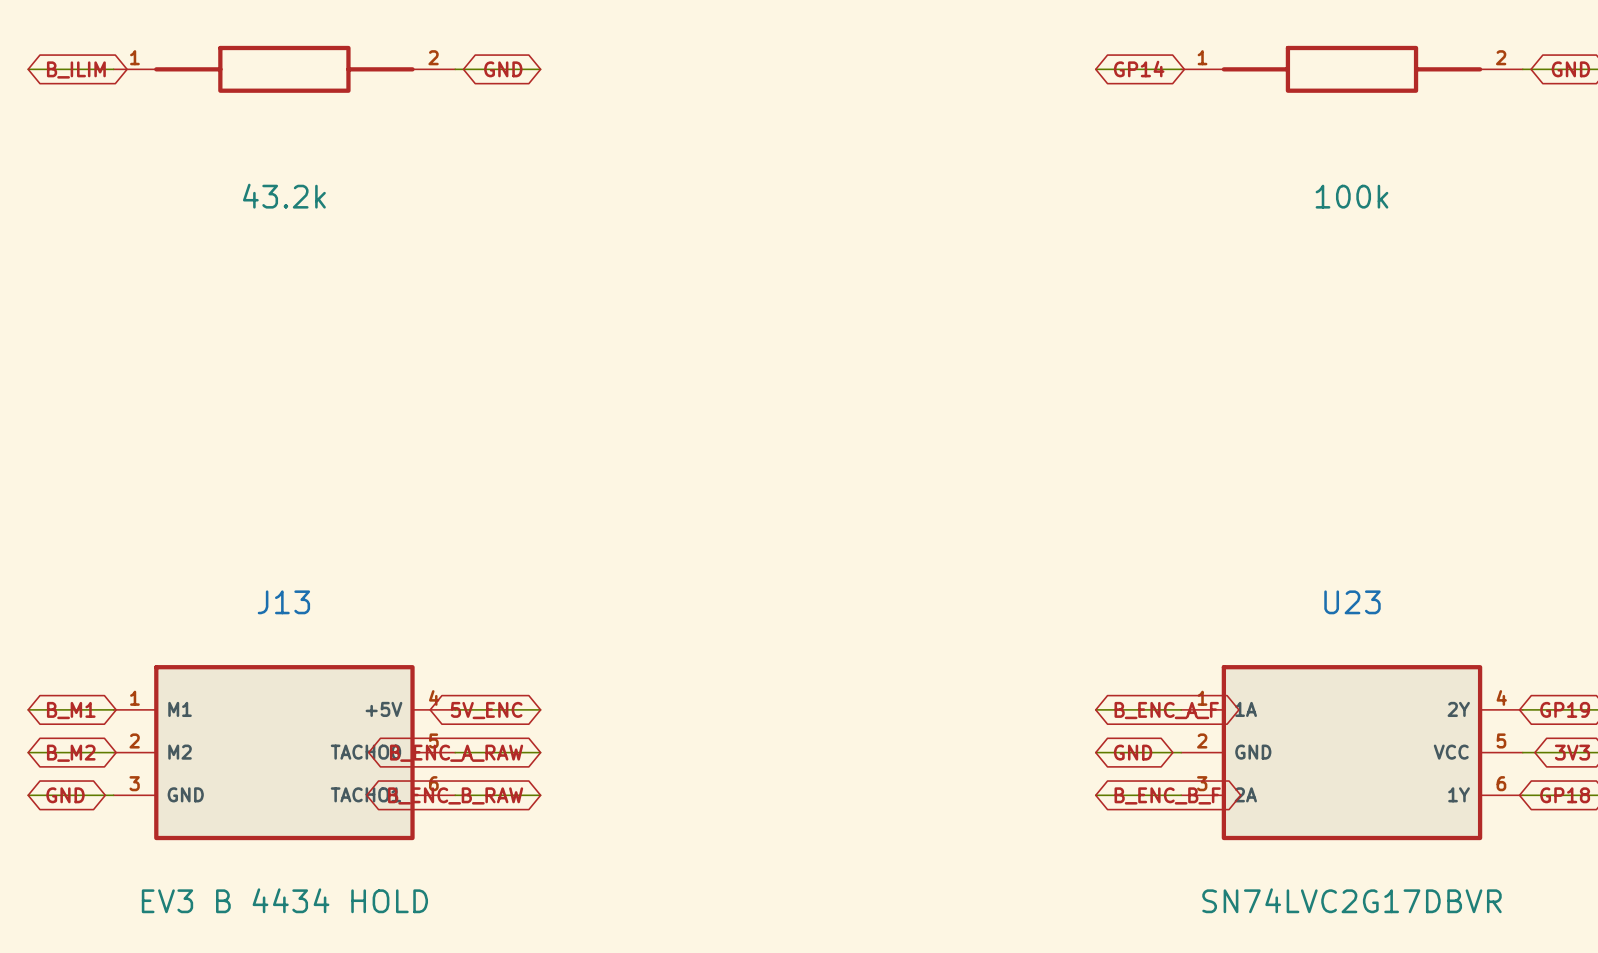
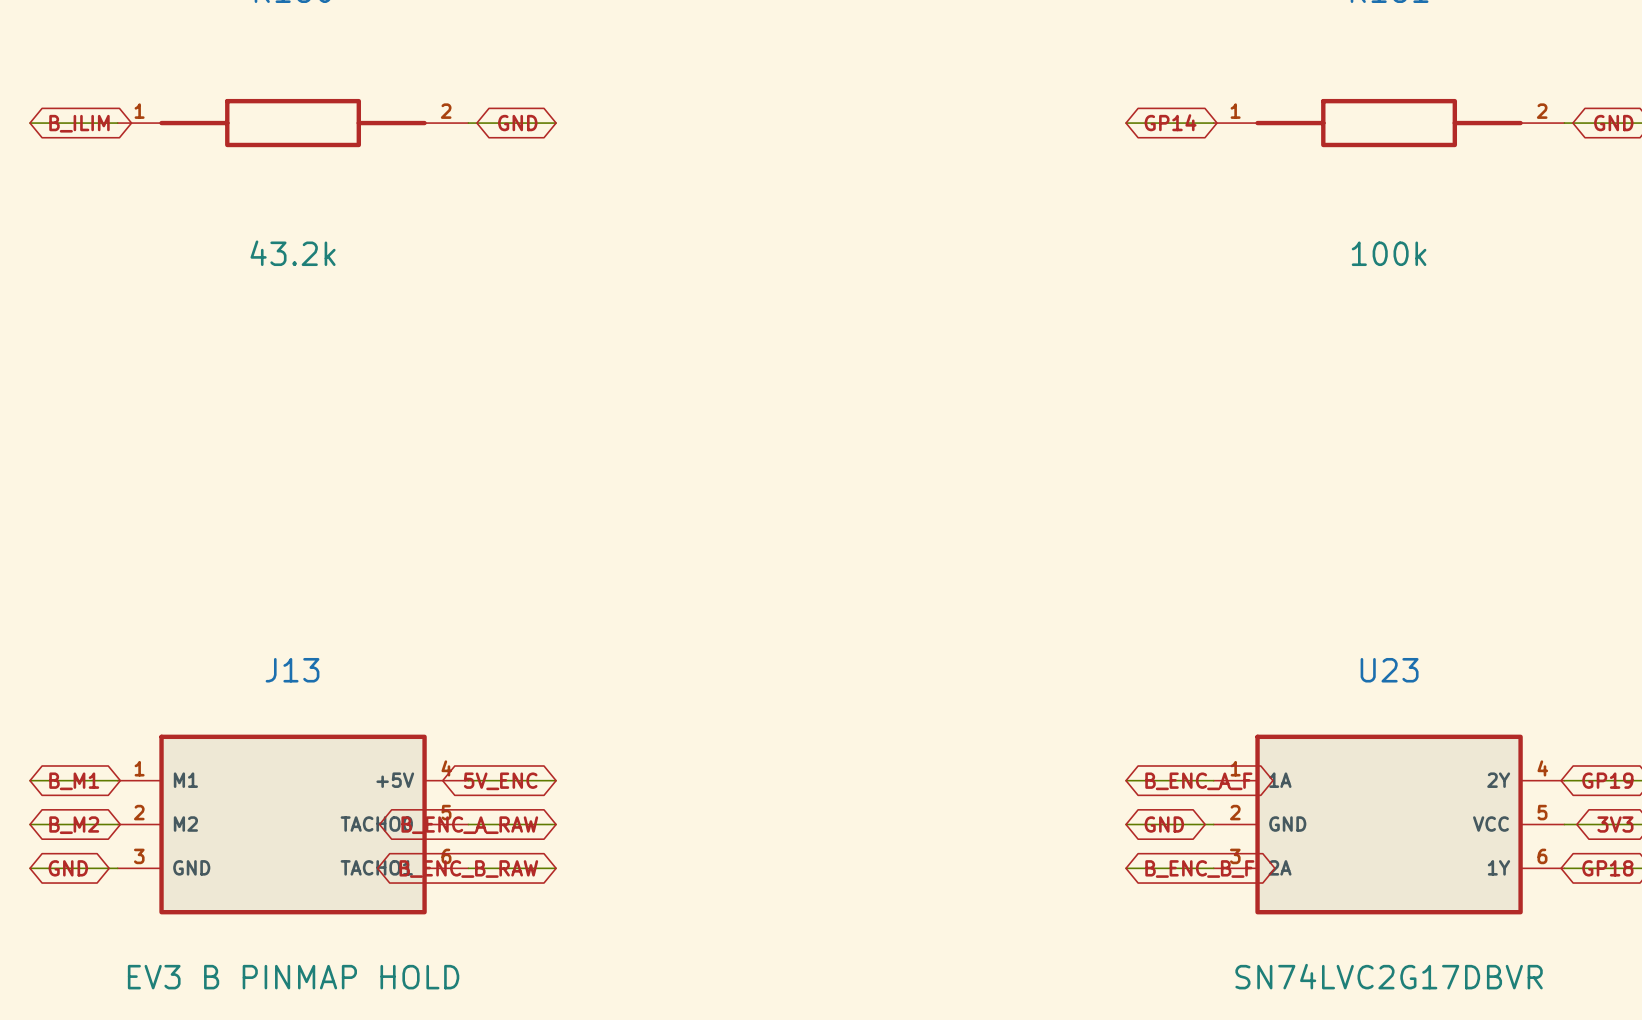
J13 value: EV3 B 4434 HOLD (284, 900) -> EV3 B PINMAP HOLD (293, 977)

